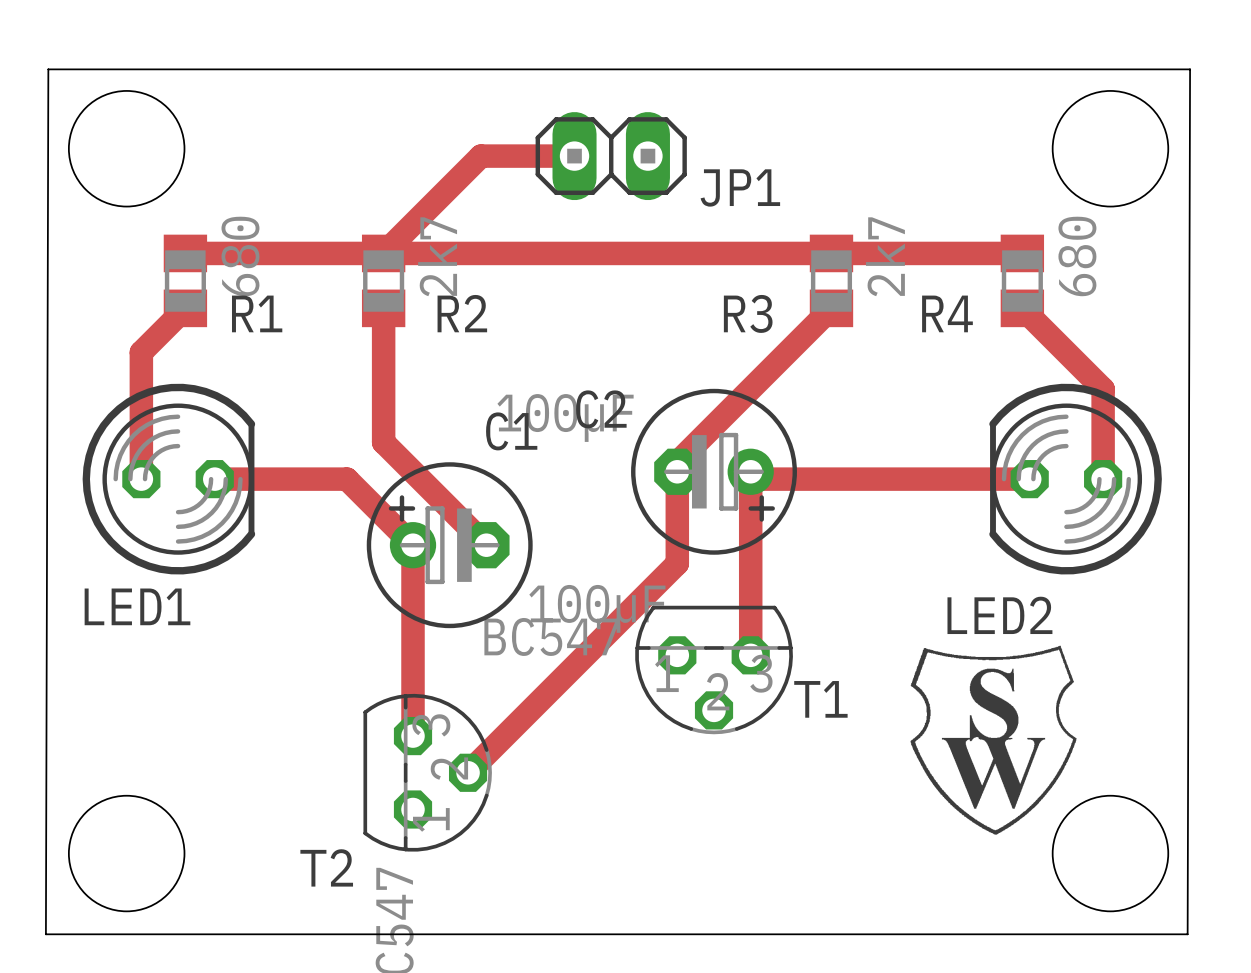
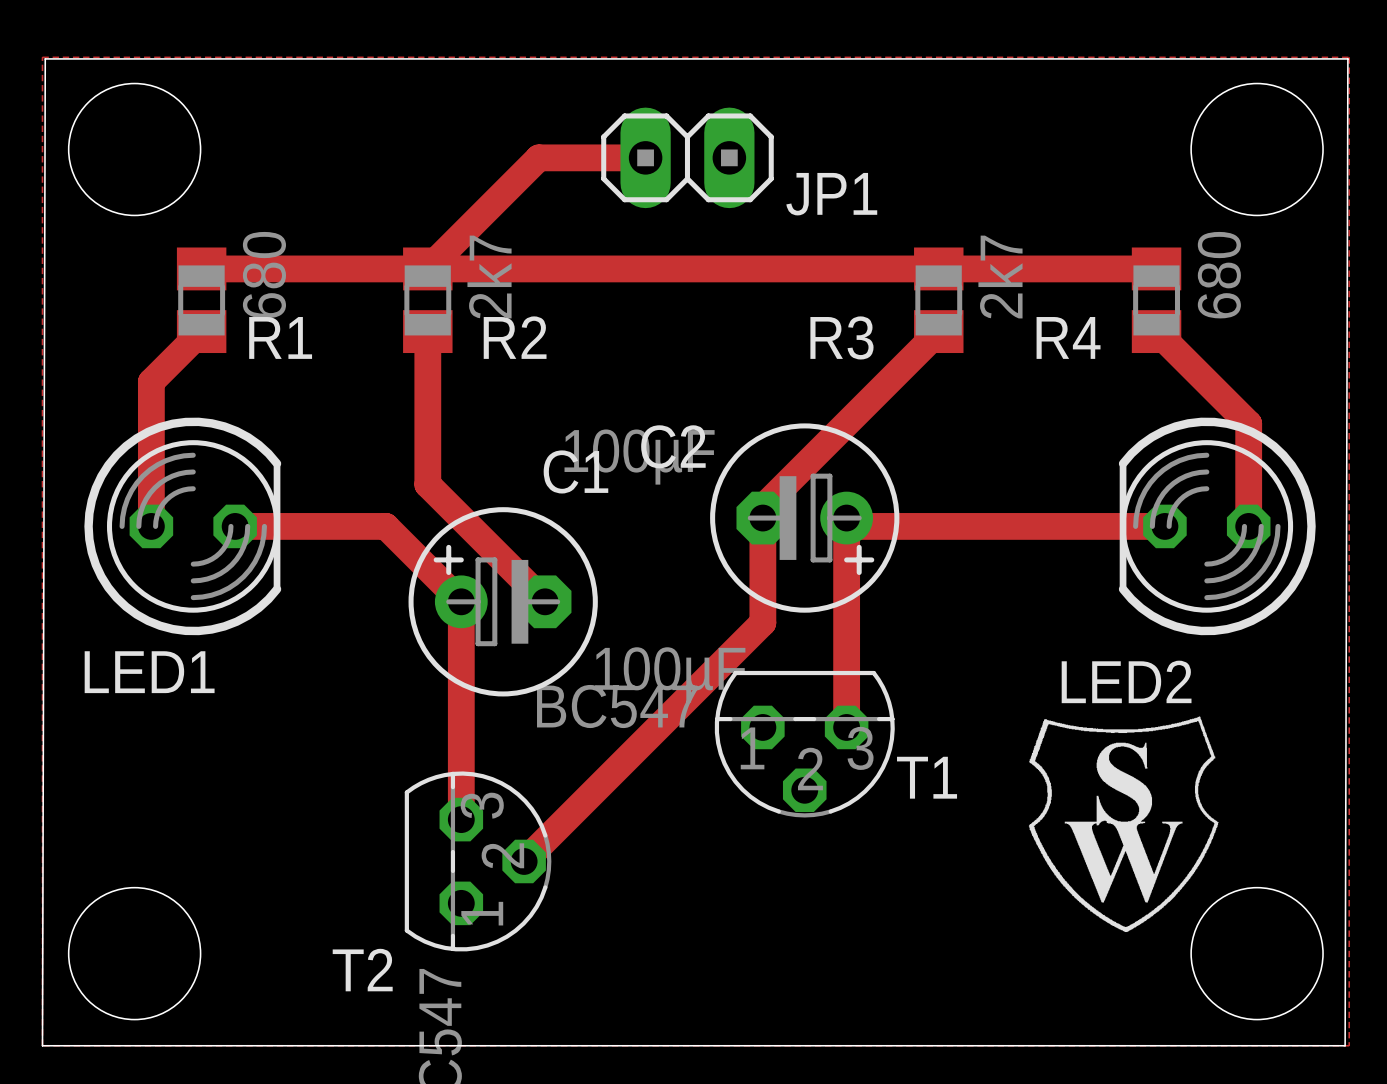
zone outline: none -> (42, 57) (1349, 57) (1349, 1045) (42, 1045) (42, 57)

